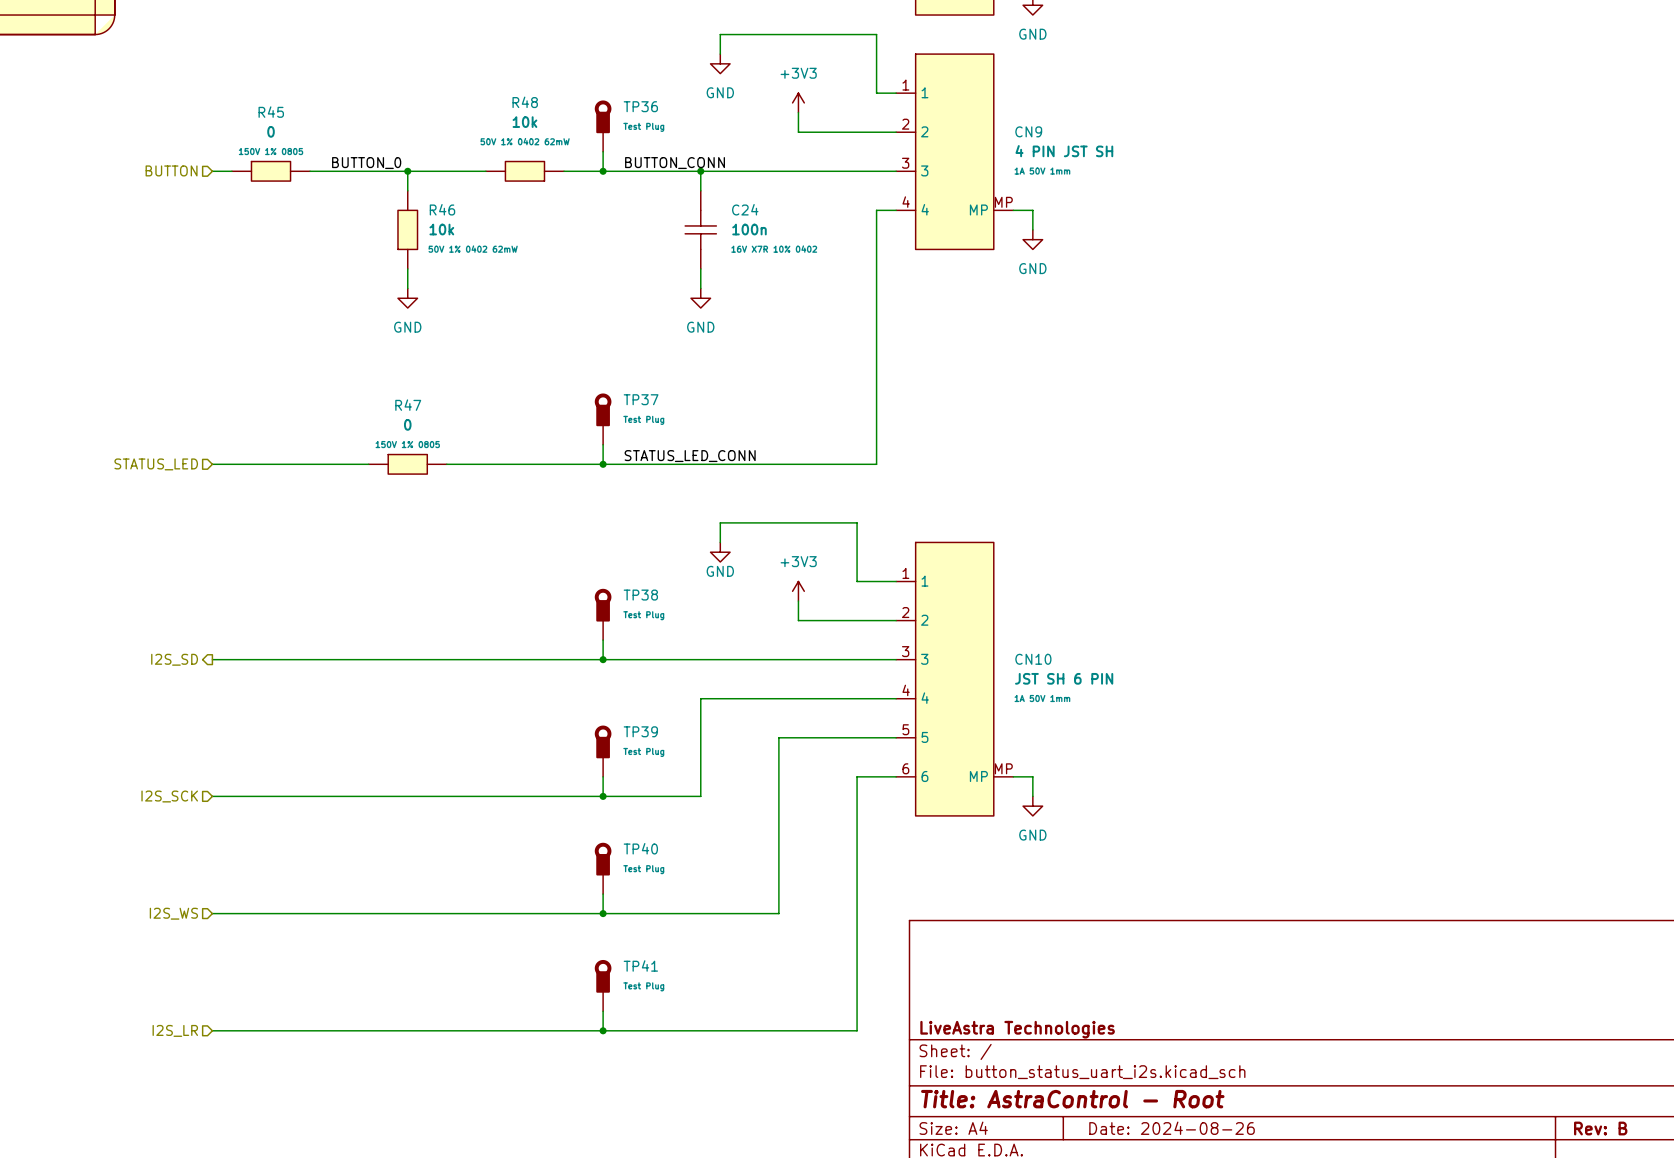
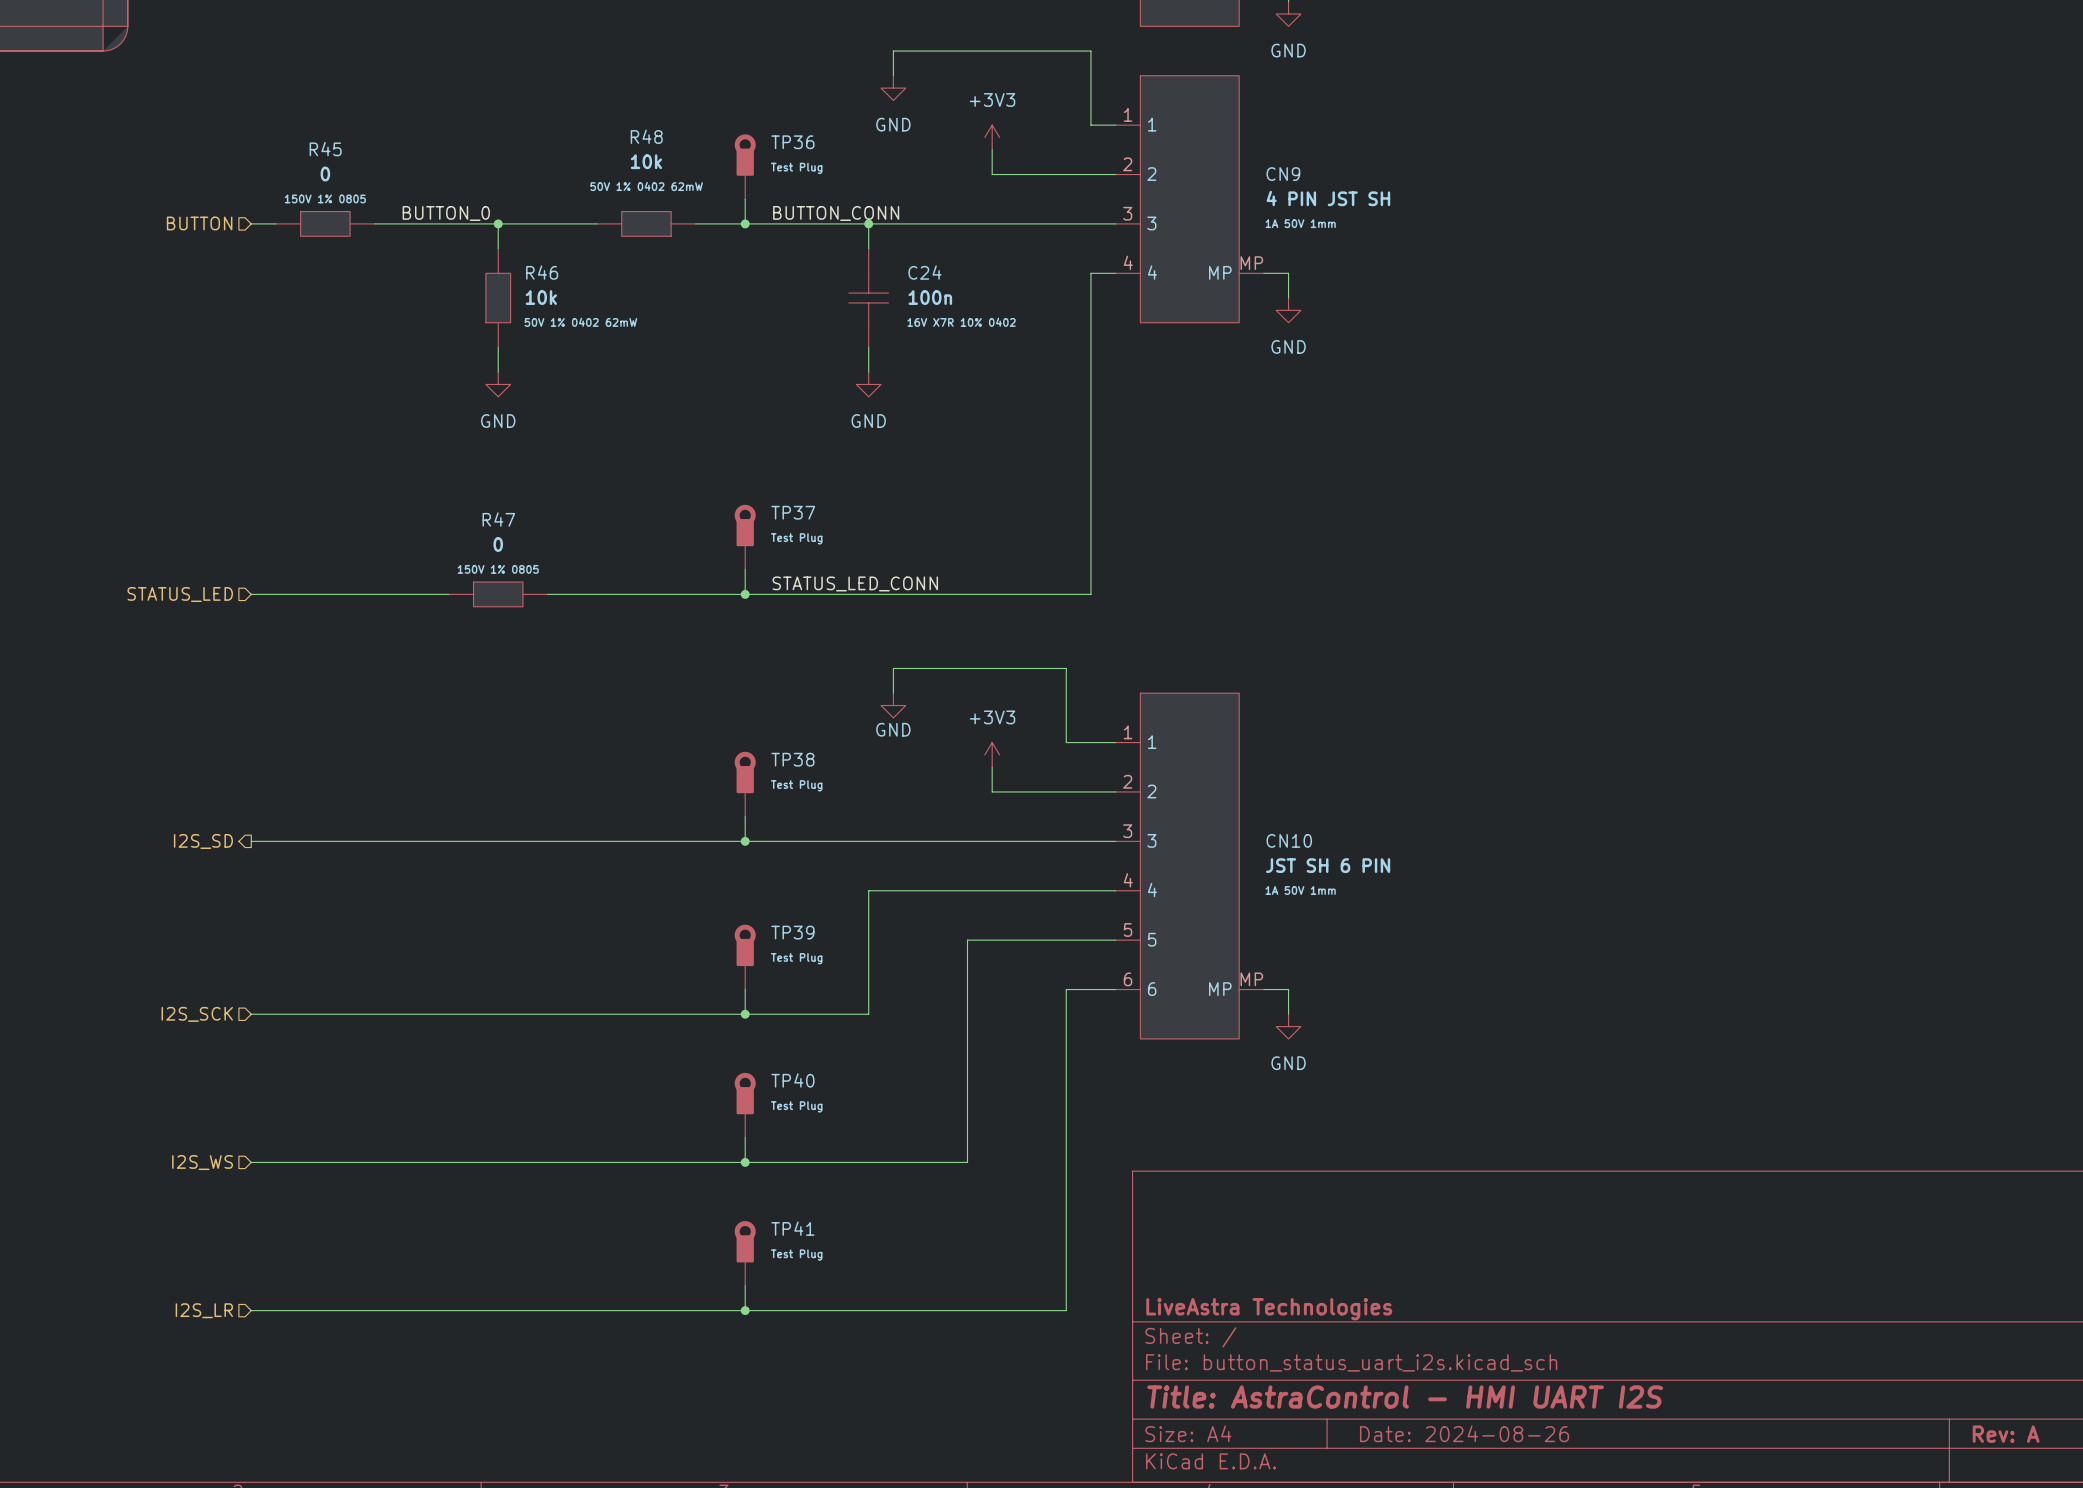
title block: Title: AstraControl - Root (1072, 1099) -> Title: AstraControl - HMI UART I2S (1405, 1397)
title block: Rev: B (1600, 1128) -> Rev: A (2006, 1434)

